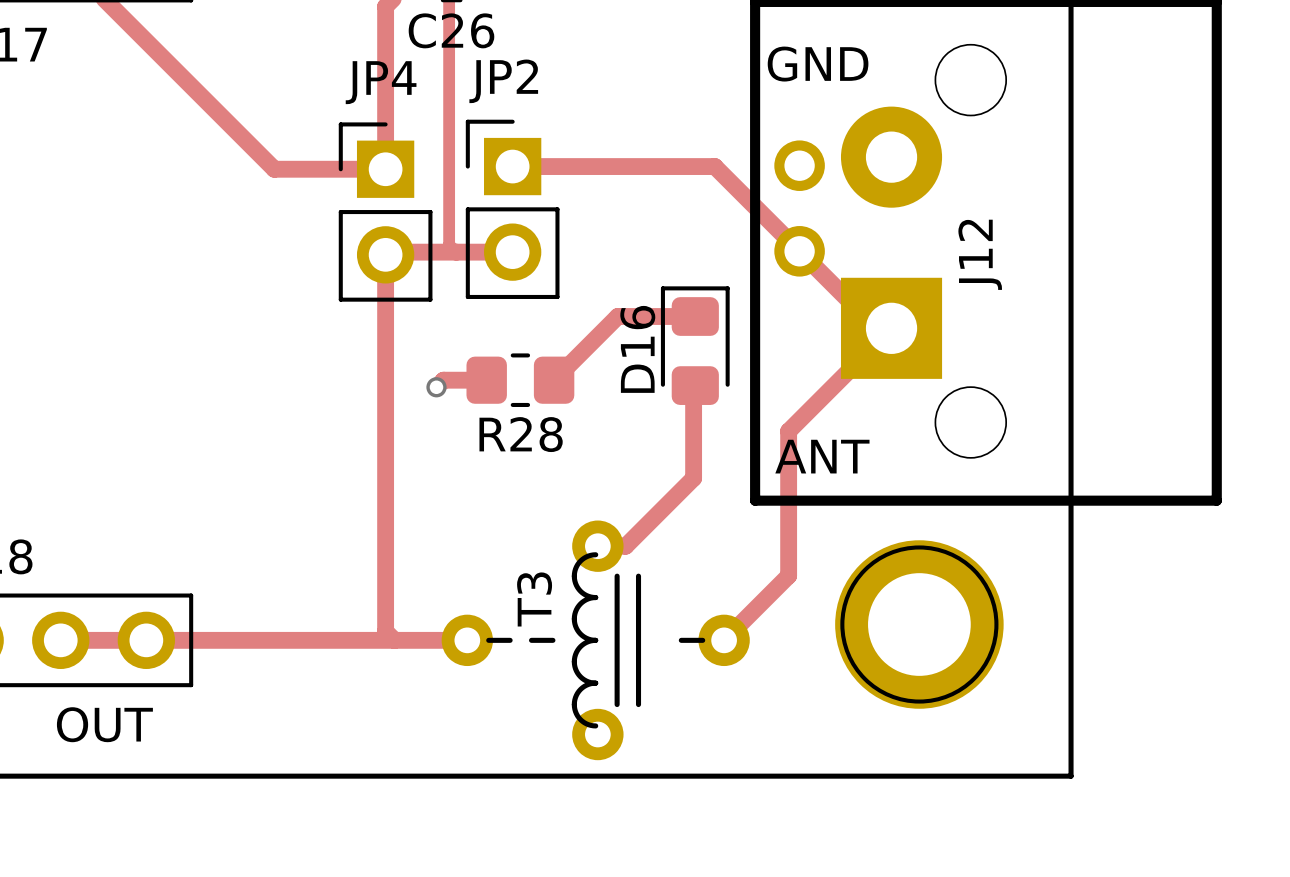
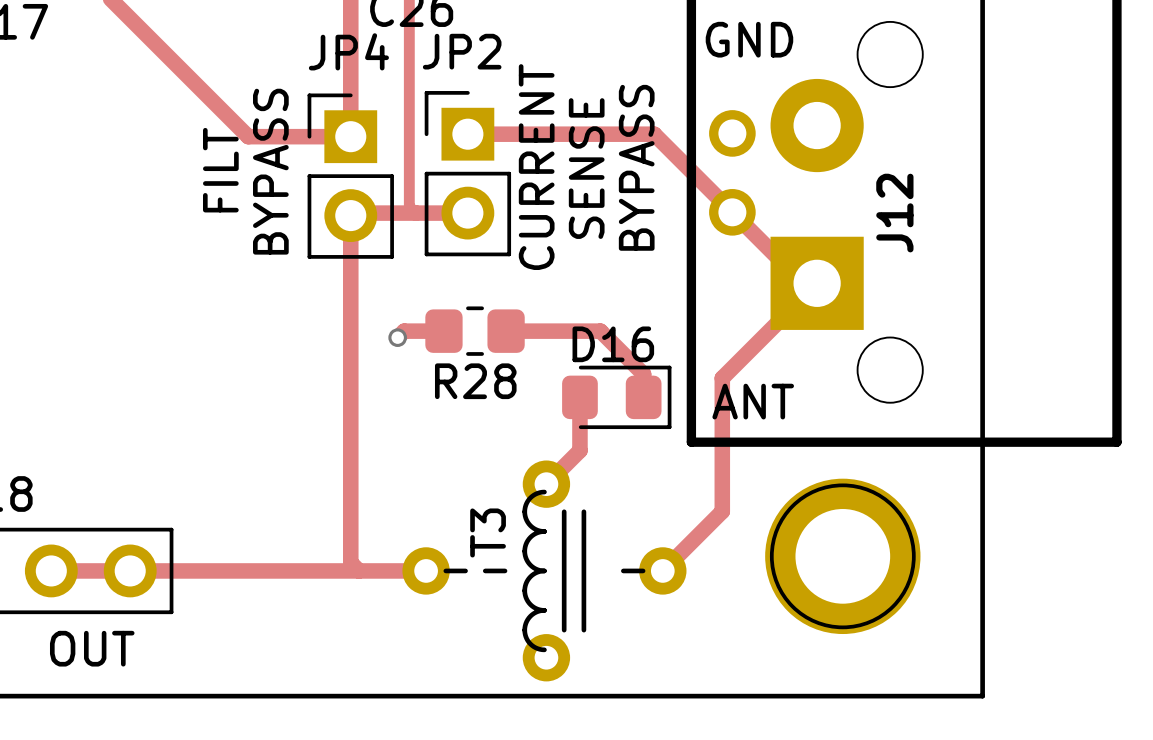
text: none -> CURRENT (536, 167)
text: none -> BYPASS (636, 167)
text: none -> SENSE (586, 168)
text: none -> FILT (220, 170)
text: none -> BYPASS (270, 171)
top track: (695, 316) (617, 316) (554, 380) -> (643, 397) (643, 374) (600, 331) (506, 331)
D16 rotation: 0° (695, 345) -> 90° clockwise (616, 397)
D16 position: (695, 345) -> (616, 397)
top track: (693, 379) (693, 478) (625, 546) (597, 546) -> (579, 397) (579, 450) (546, 484)

